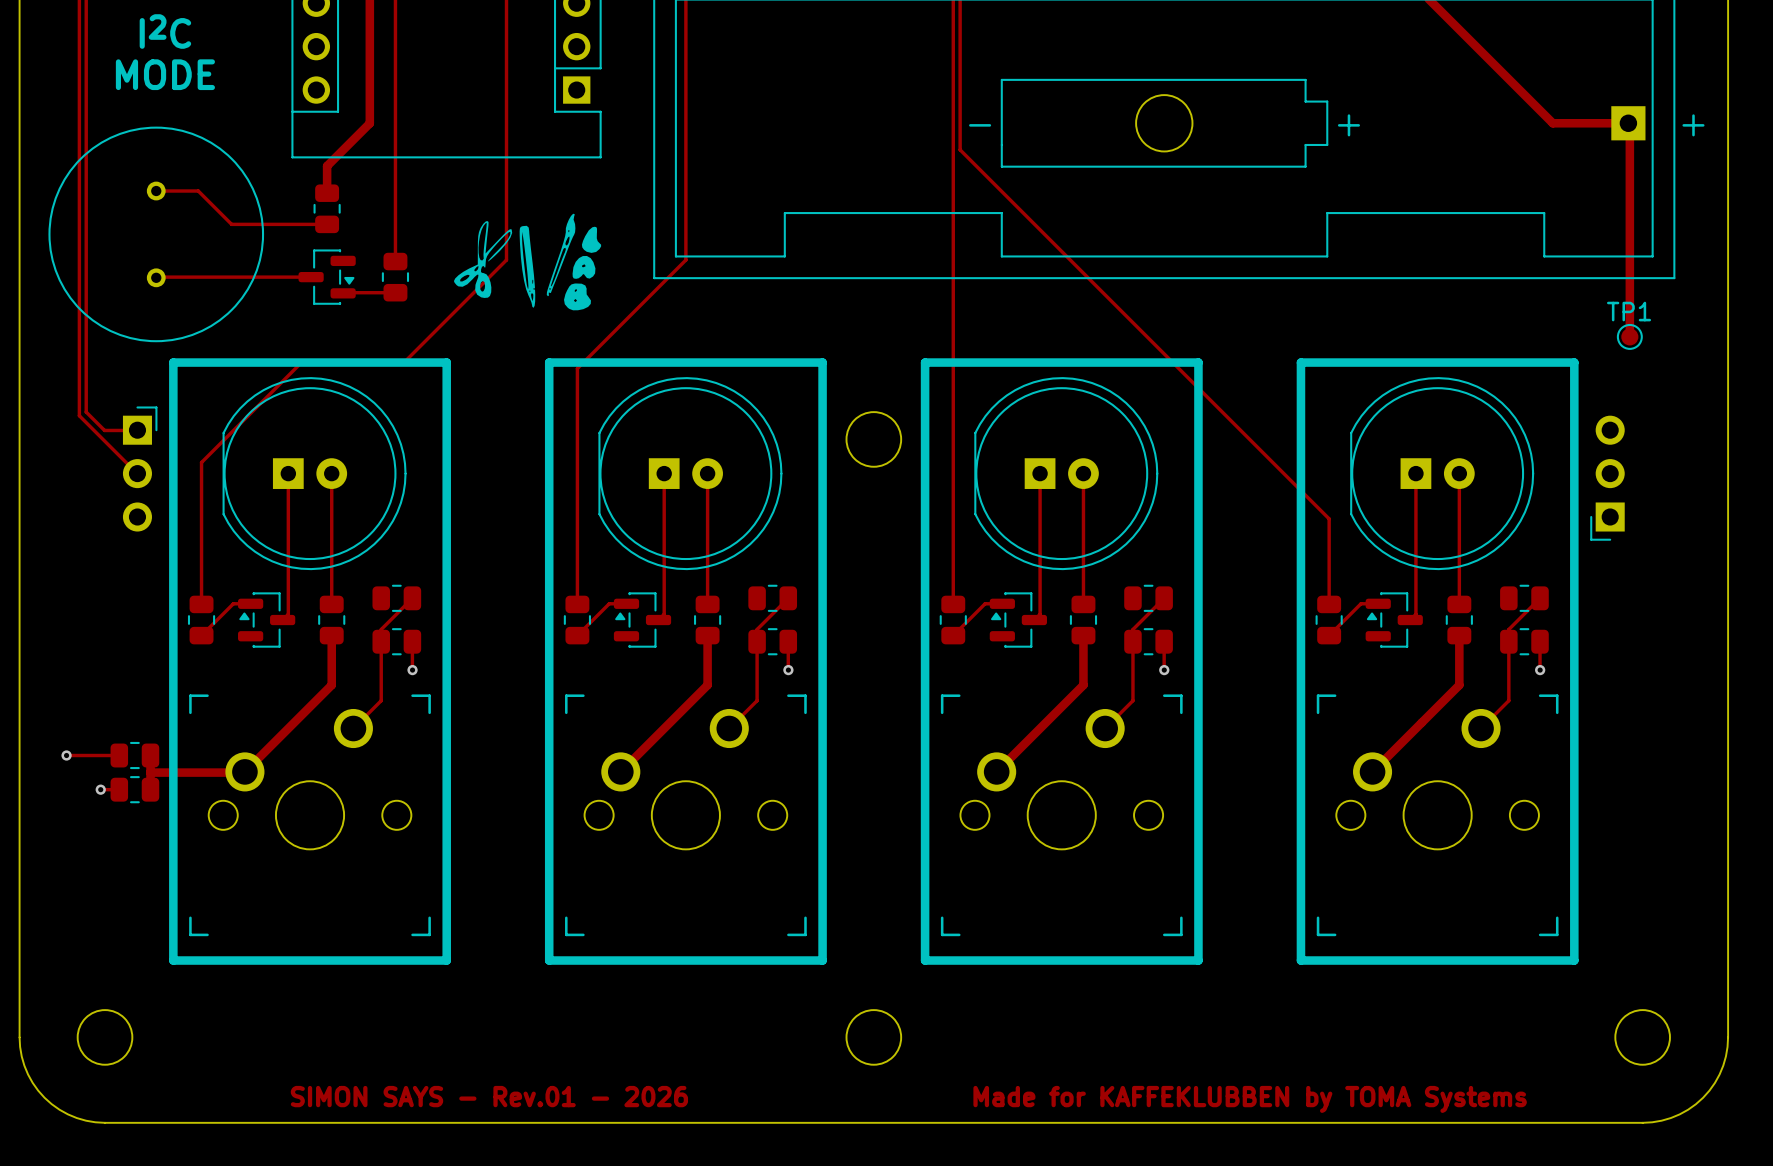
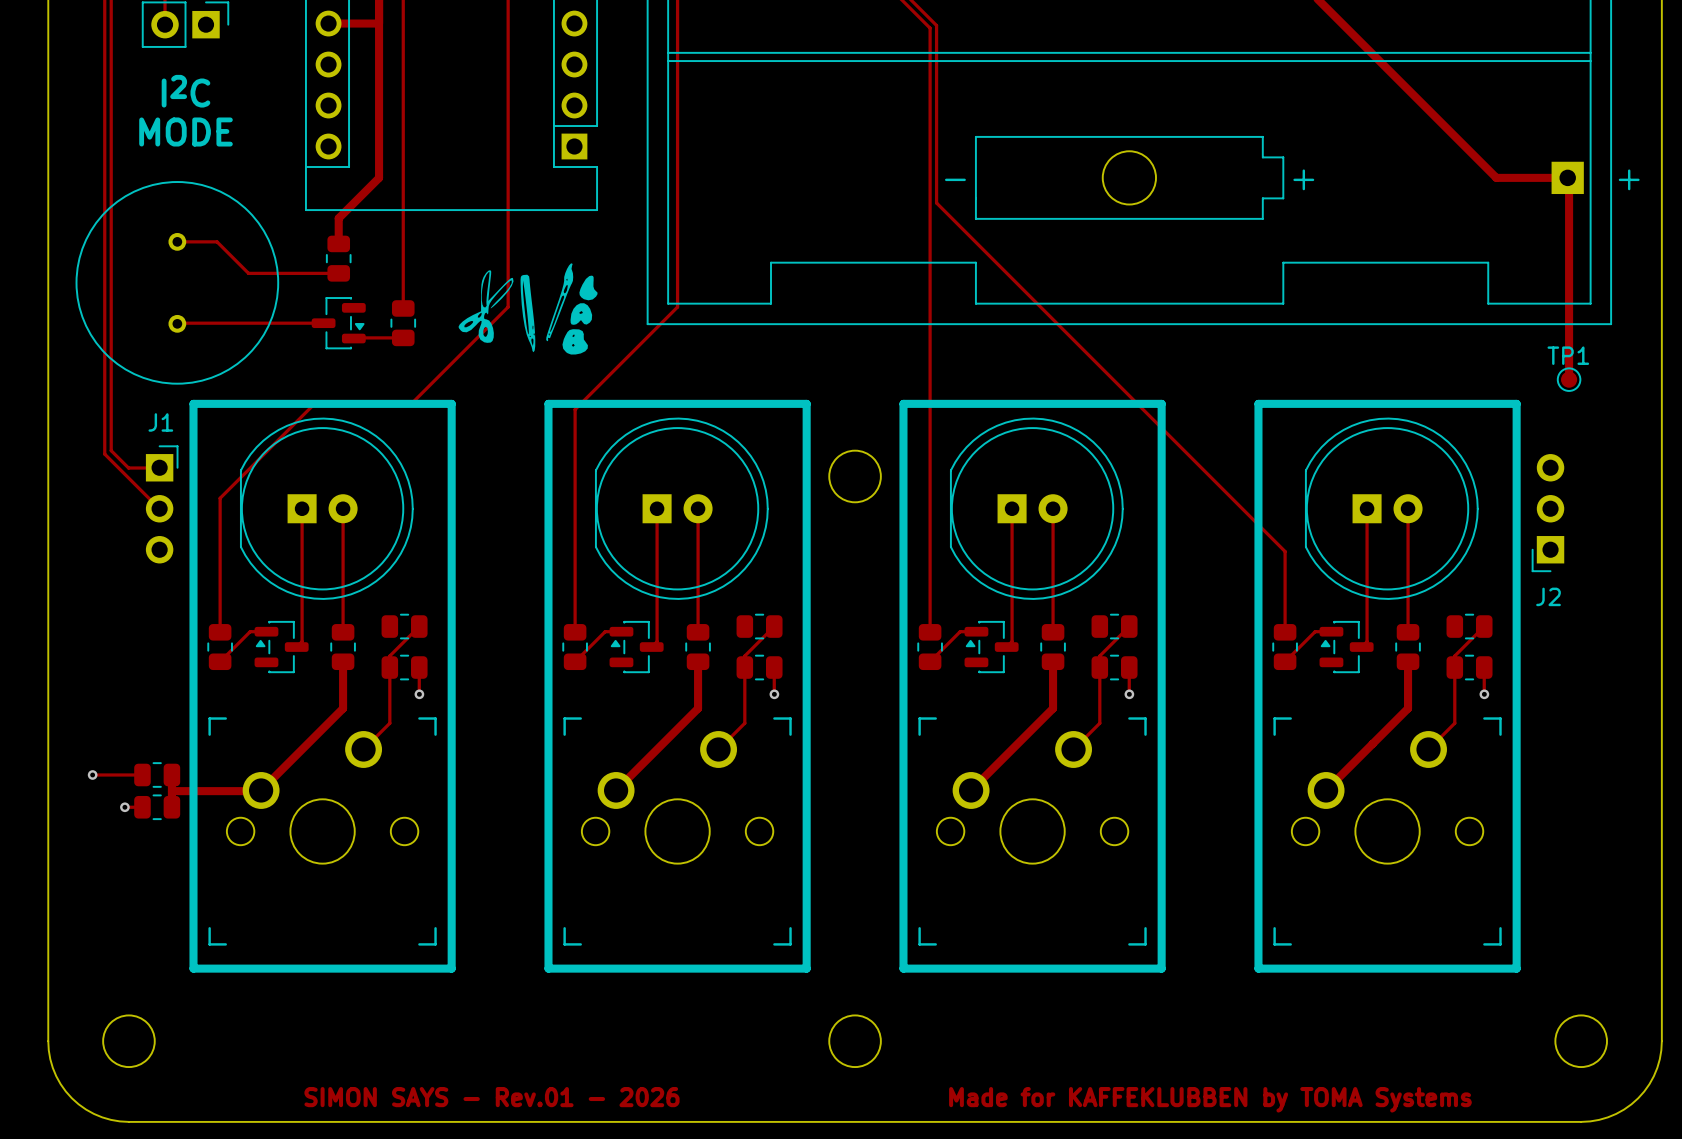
J1 name: none -> J1 (160, 422)
J2 name: none -> J2 (1548, 596)

